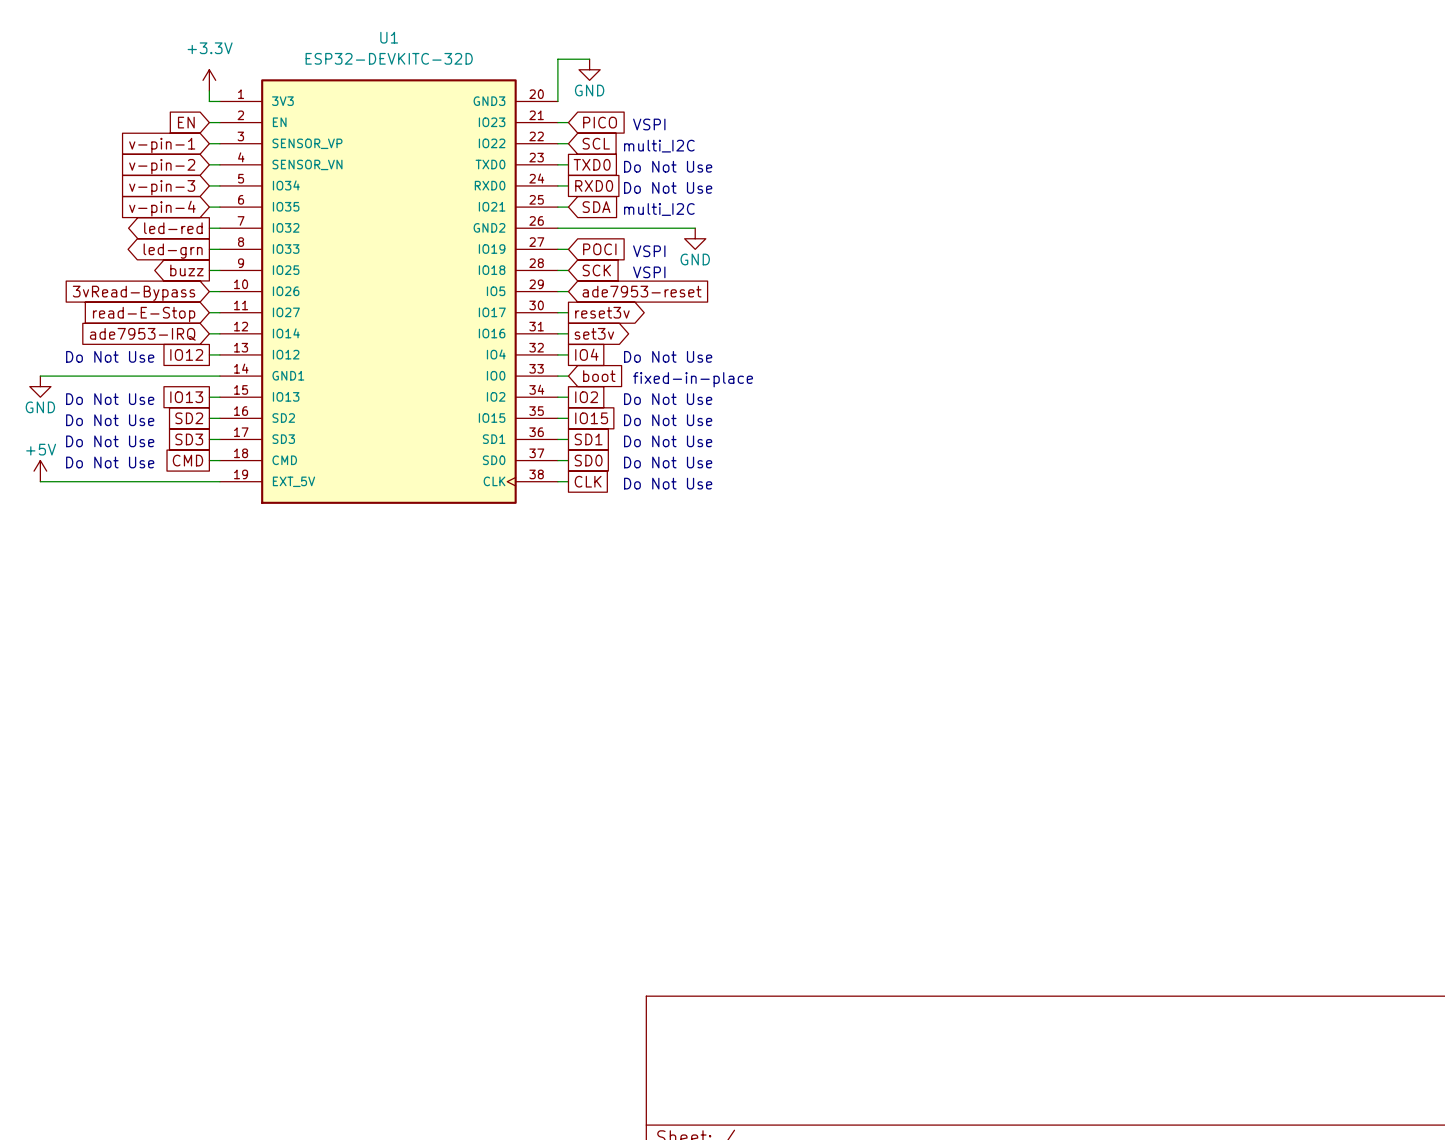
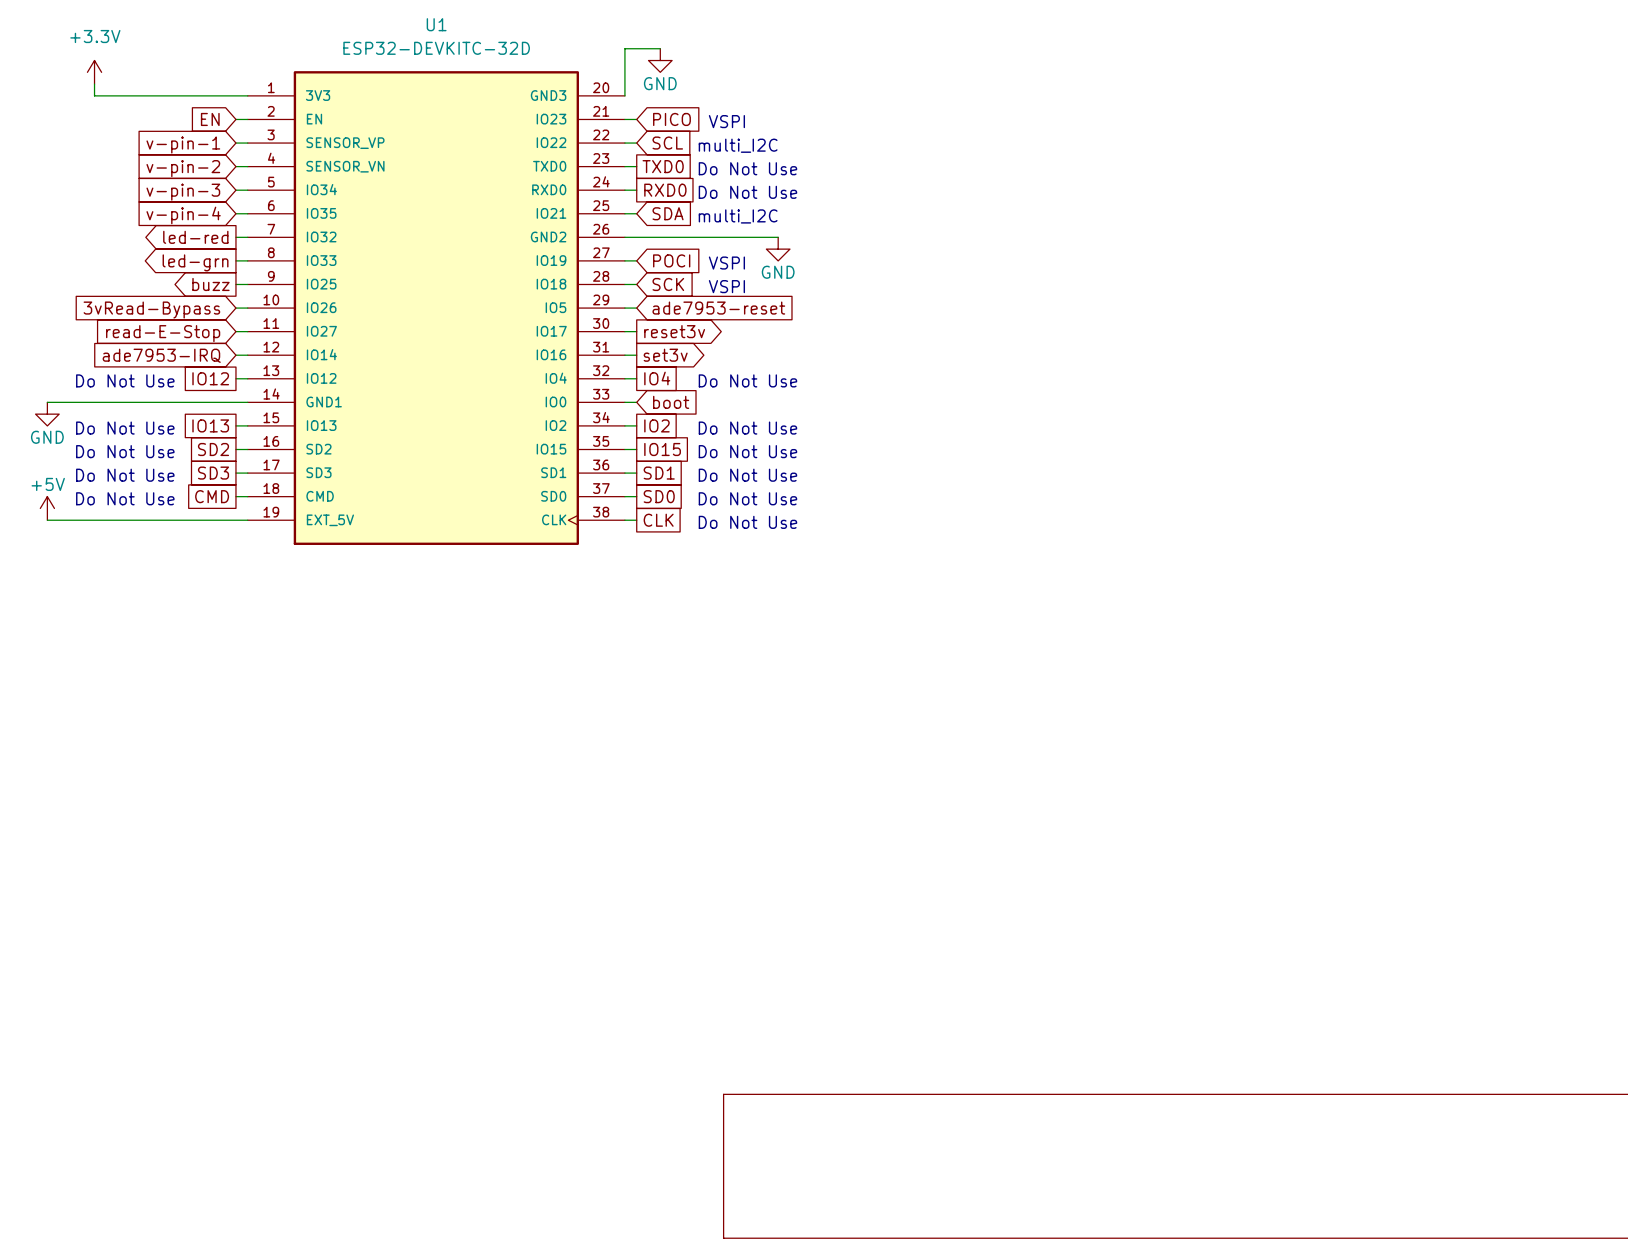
power symbol position: +3.3V (209, 80) -> +3.3V (94, 72)
wire: (209, 90) (209, 101) -> (94, 84) (94, 95) (235, 95)
text: fixed-in-place (693, 379) -> none

